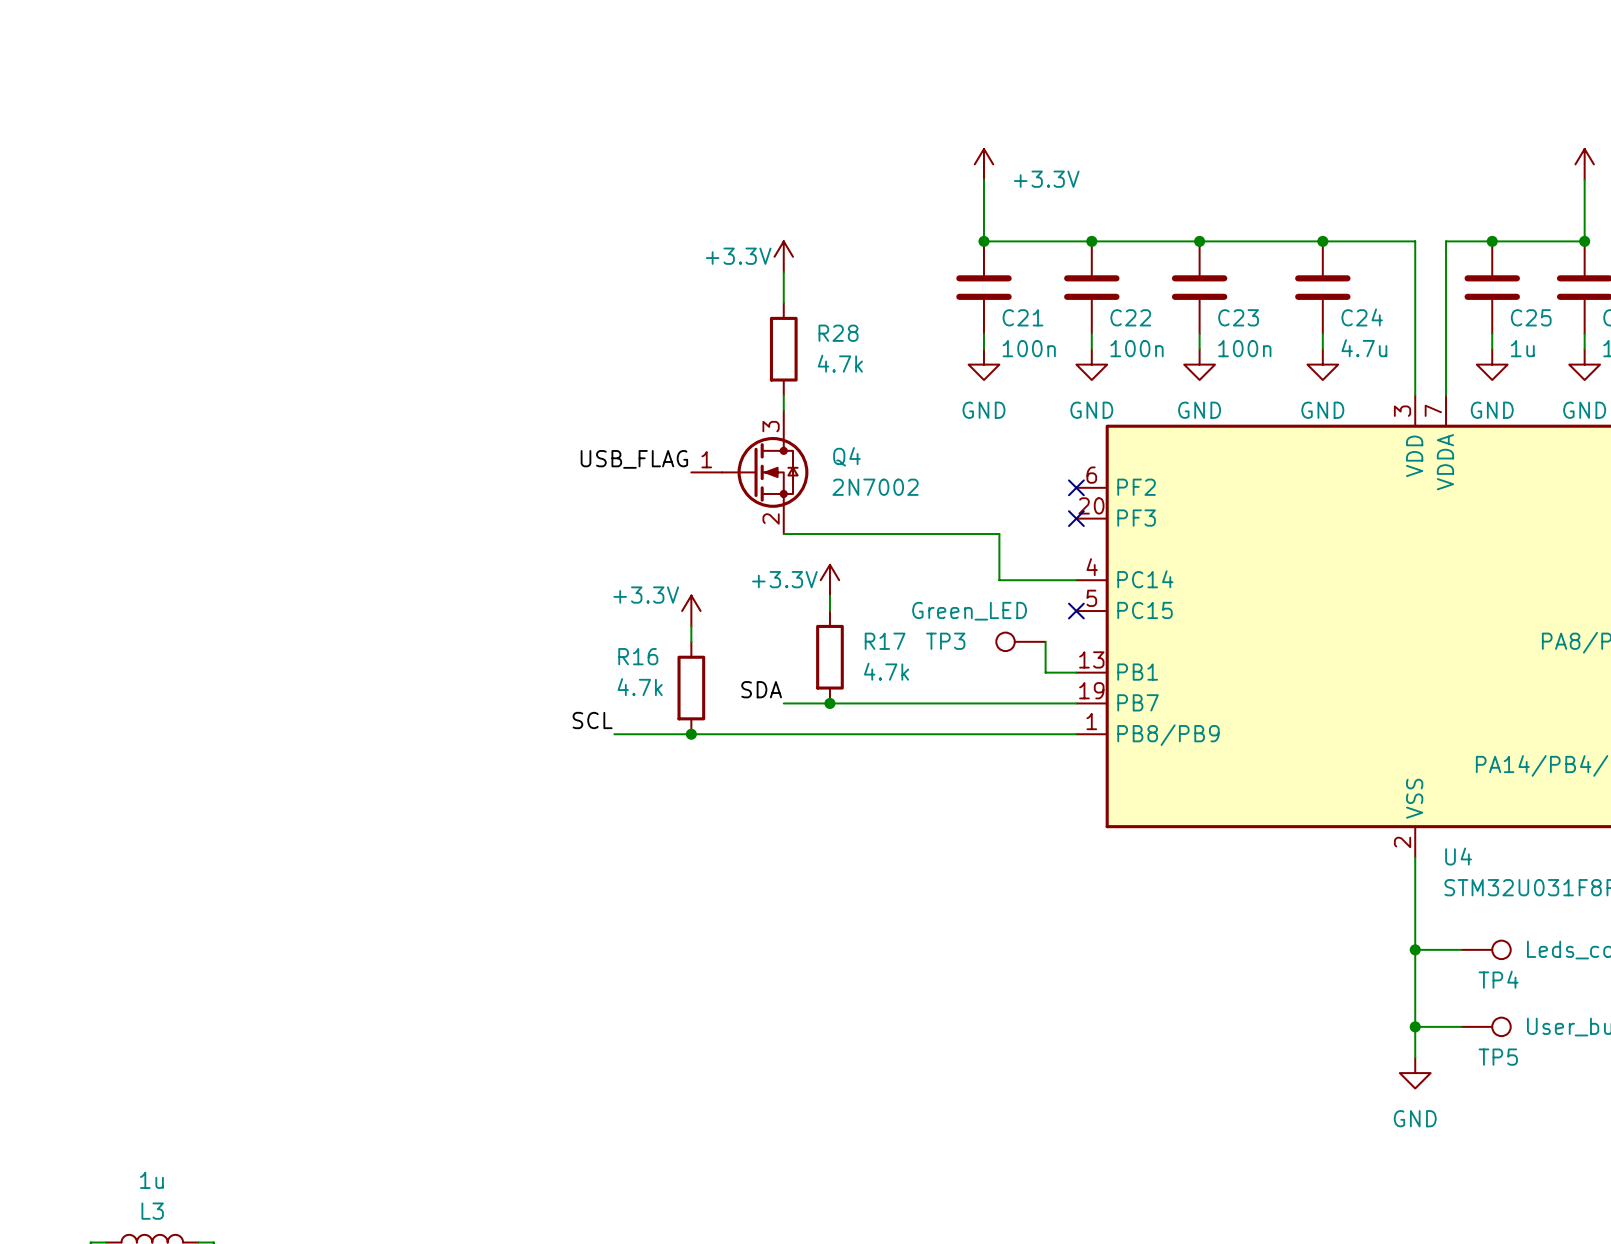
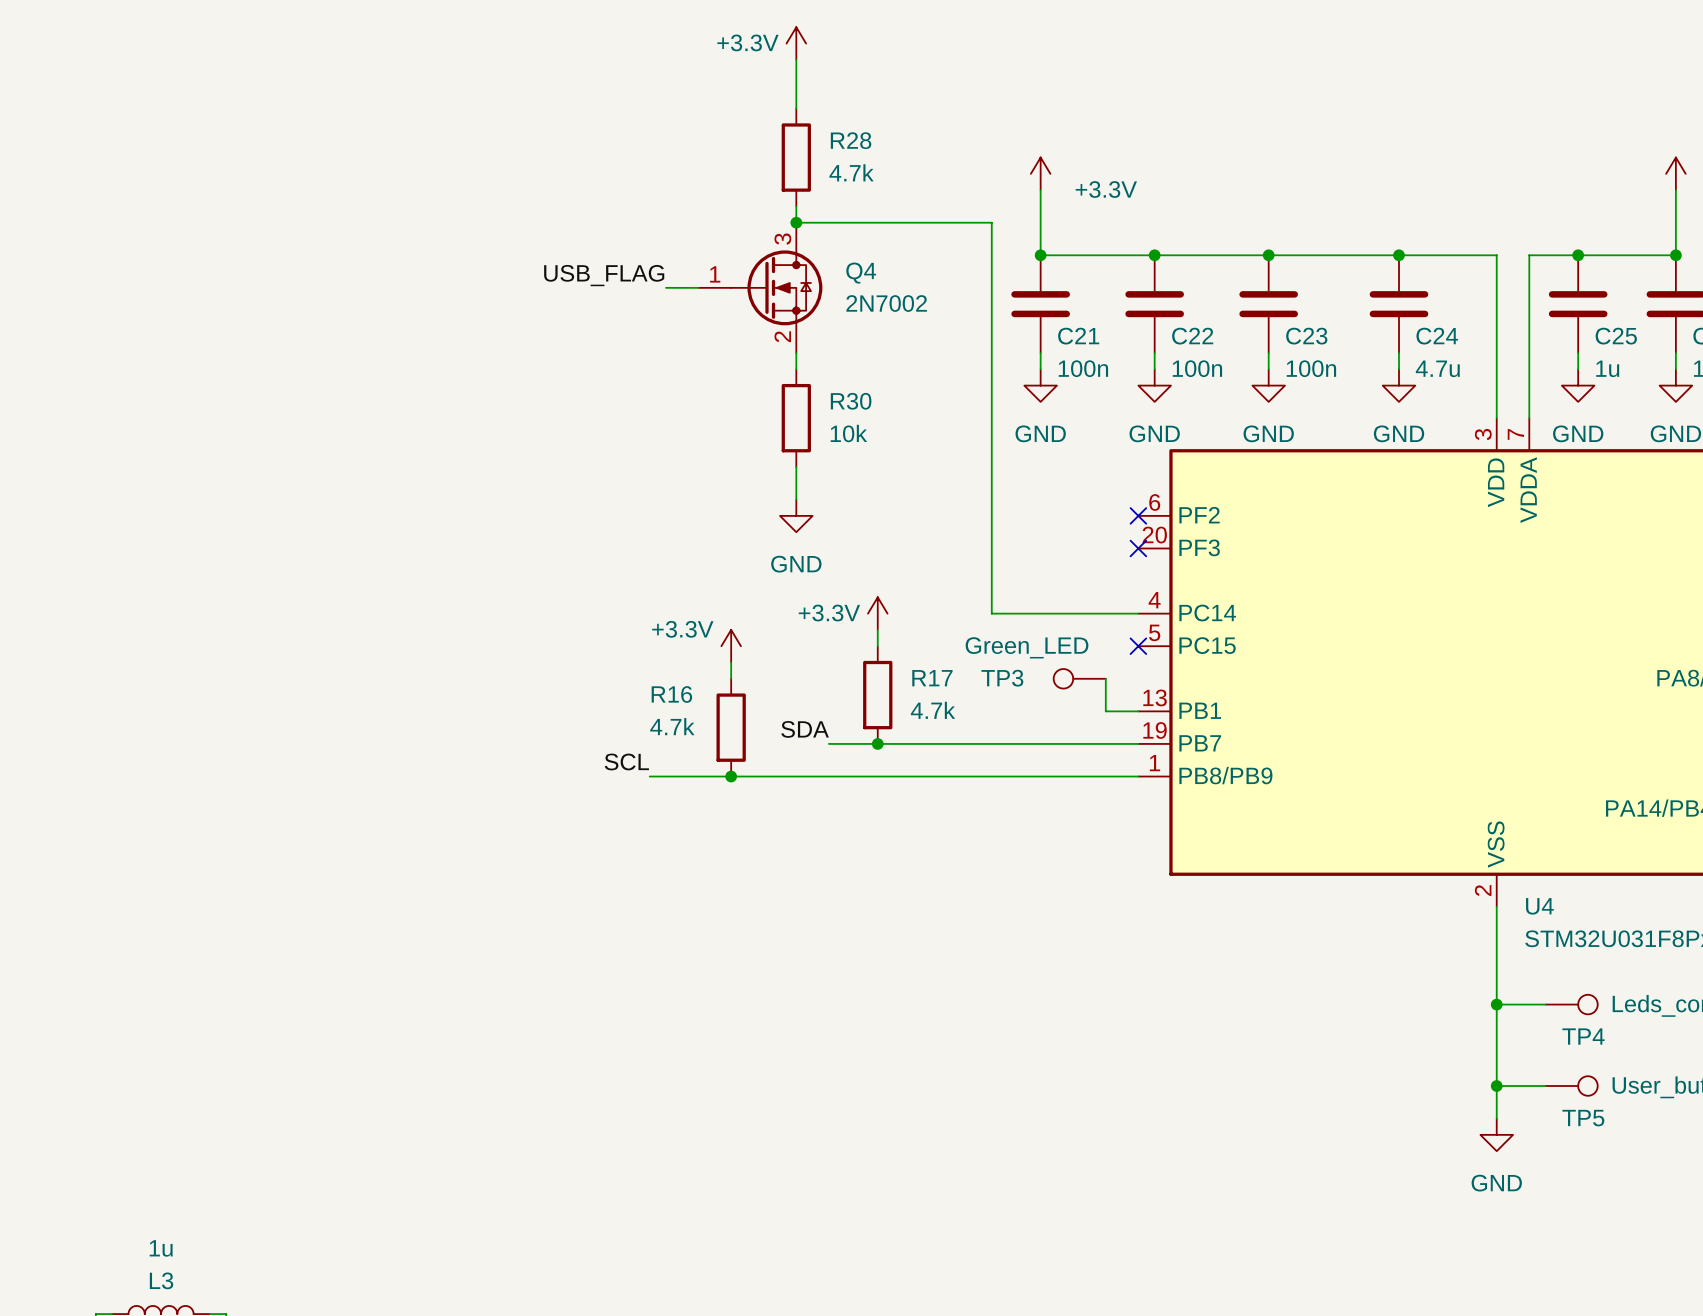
wire: none -> (796, 59) (796, 108)
junction: none -> (796, 222)
power symbol position: +3.3V (783, 256) -> +3.3V (796, 43)
wire: none -> (666, 287) (698, 287)
wire: (783, 272) (783, 302) -> (796, 467) (796, 499)
R28 position: (783, 349) -> (796, 157)
R30: none -> 10k (796, 418)
wire: (783, 395) (783, 410) -> (796, 353) (796, 369)
label position: USB_FLAG (634, 459) -> USB_FLAG (604, 275)
Q4 position: (749, 472) -> (760, 287)
power symbol: none -> GND (796, 515)
wire: (783, 534) (999, 534) (999, 580) -> (796, 206) (796, 222) (991, 222) (991, 613) (1056, 613)

